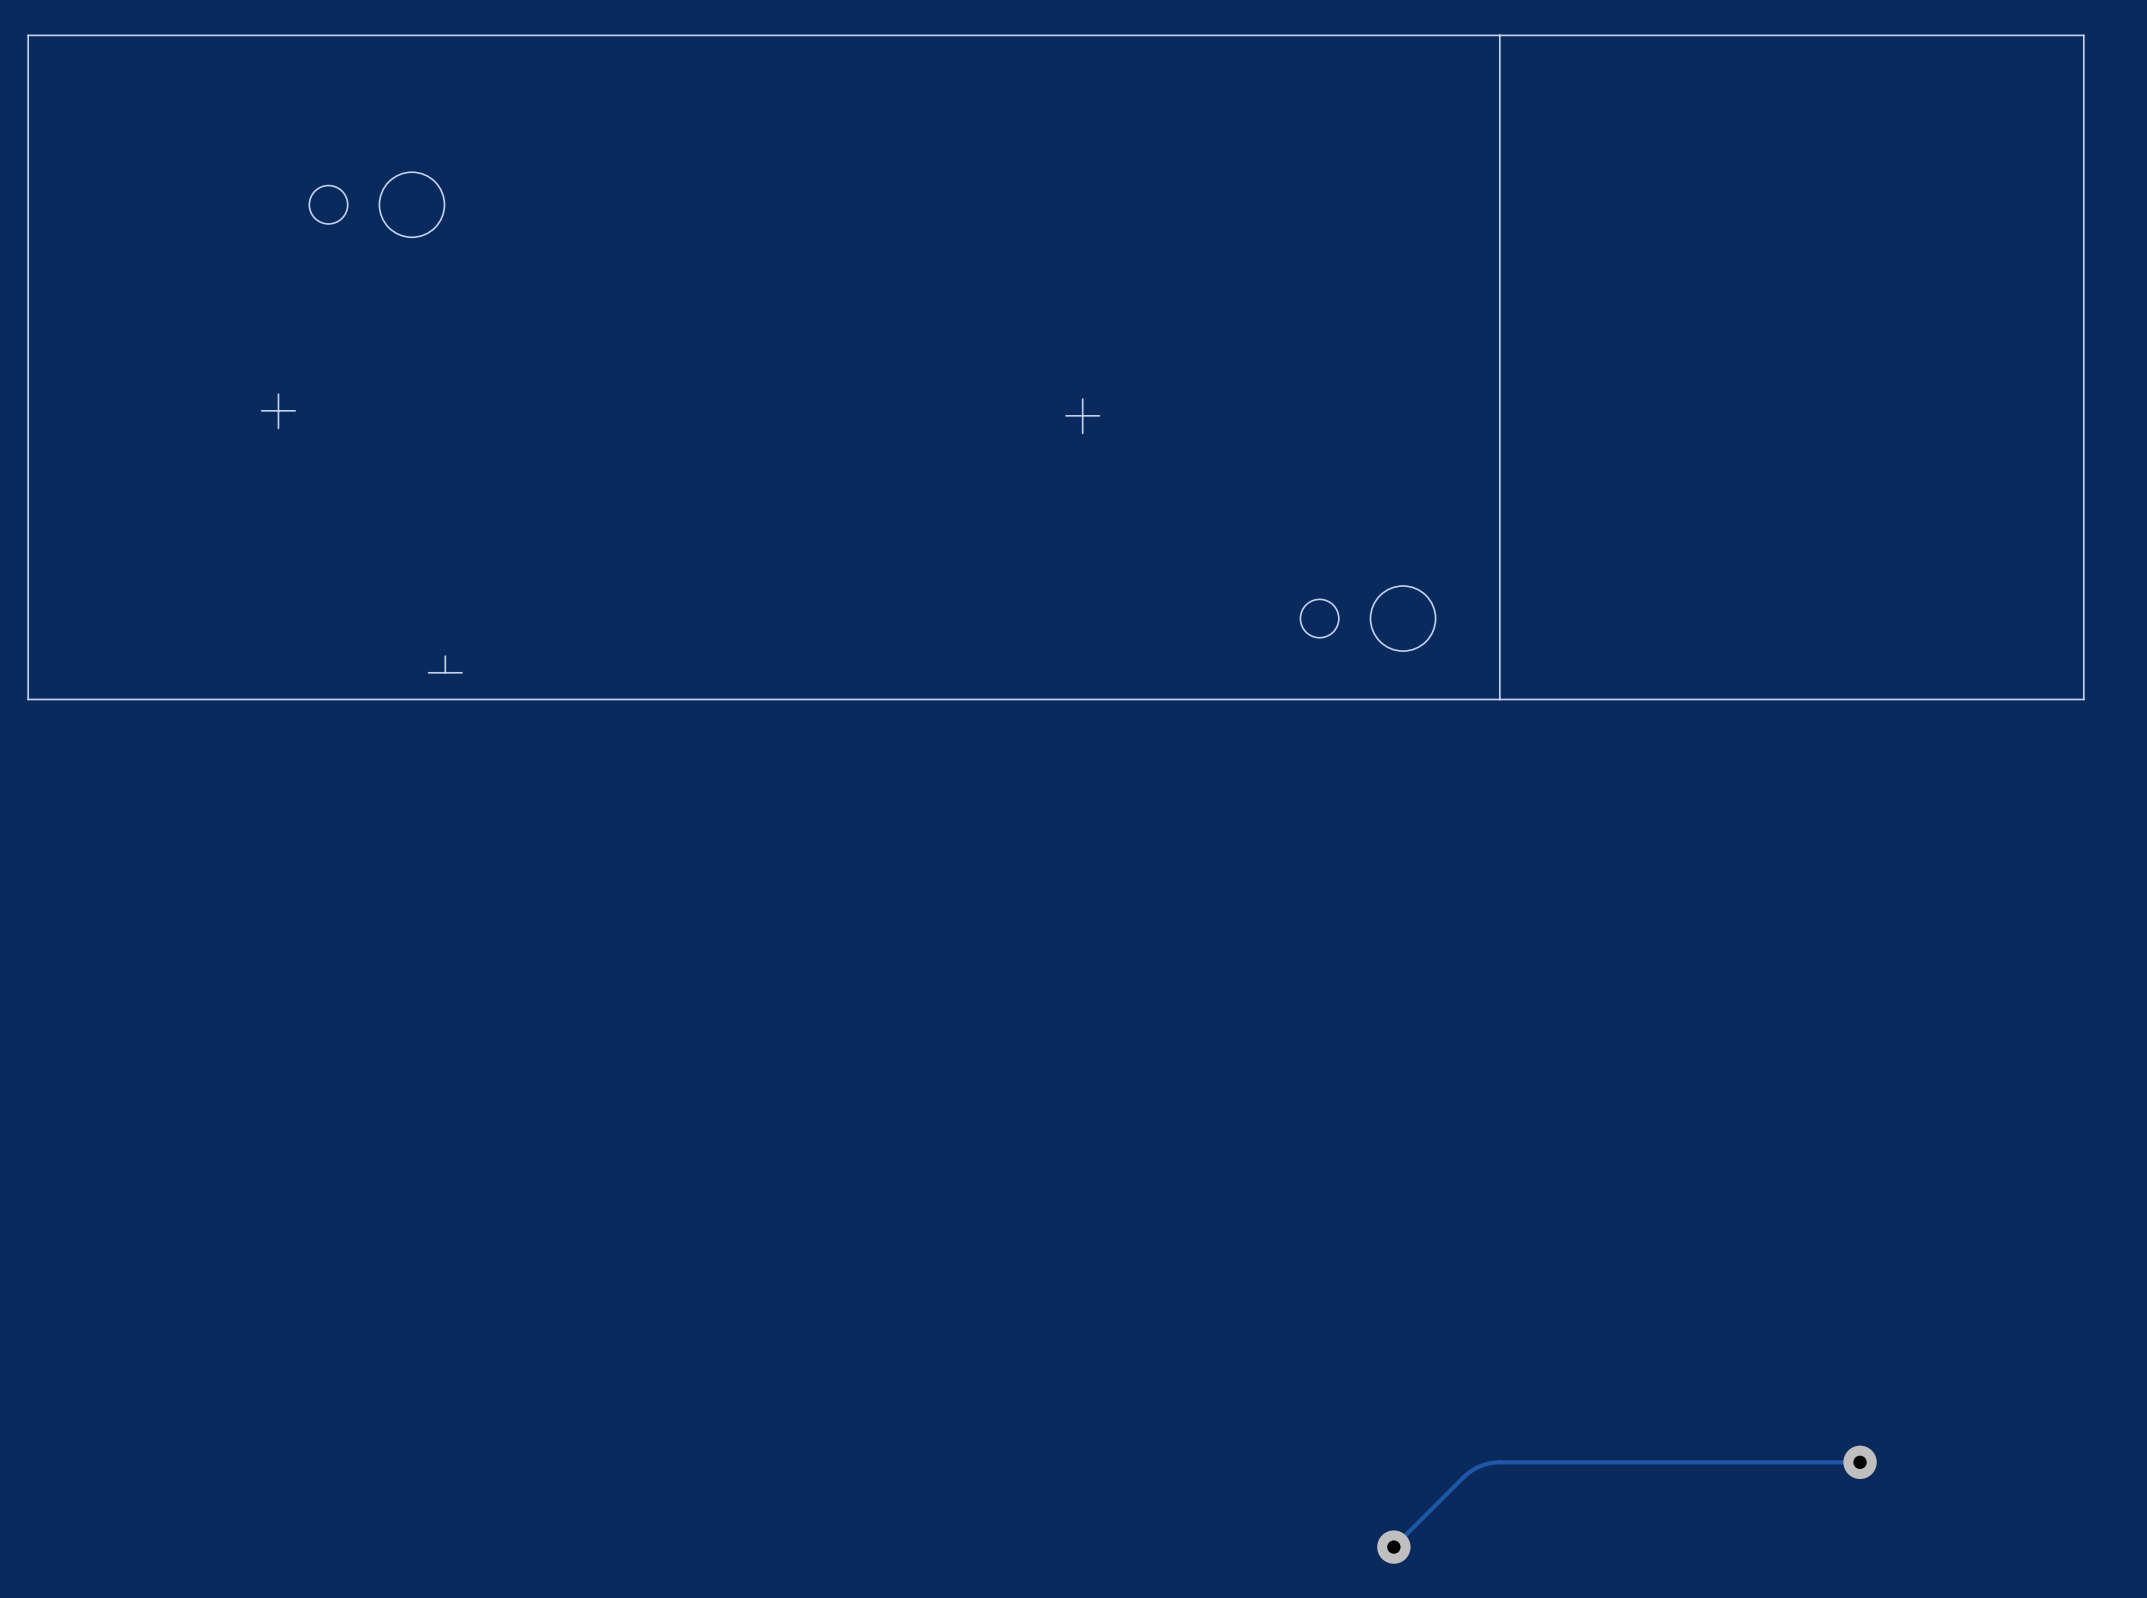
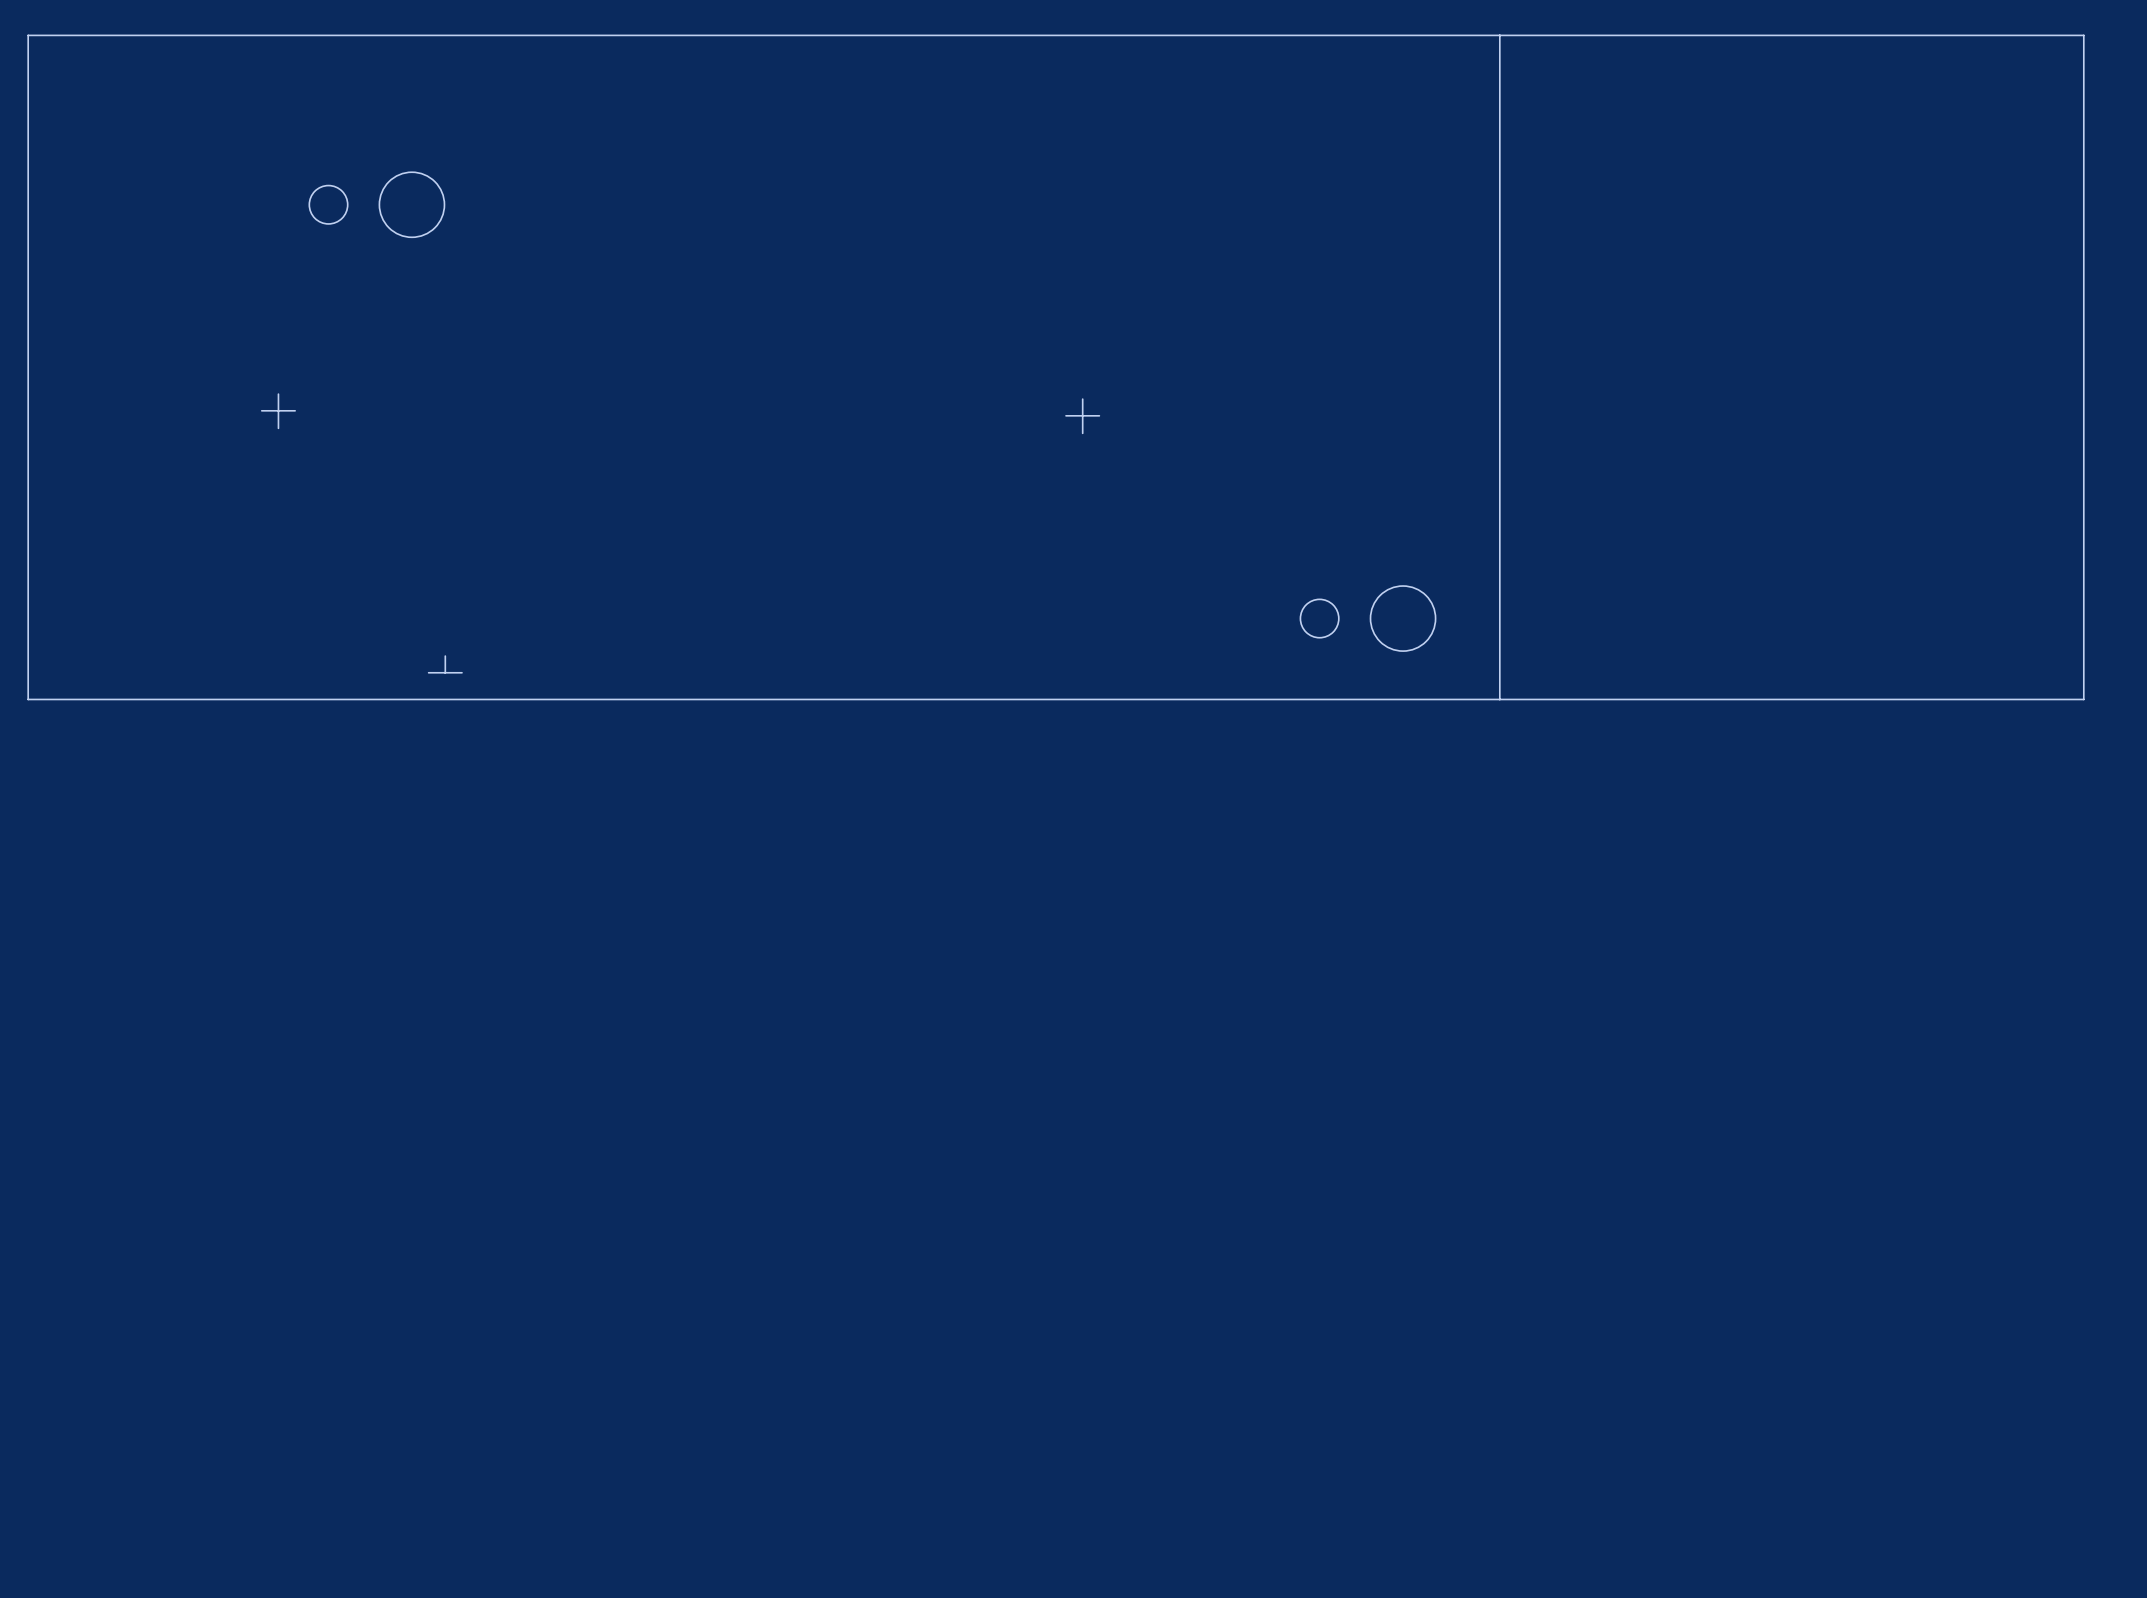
track: (1860, 1462) (1489, 1463) (1467, 1473) (1393, 1547) -> none
via: (1860, 1462) -> none
via: (1393, 1547) -> none

